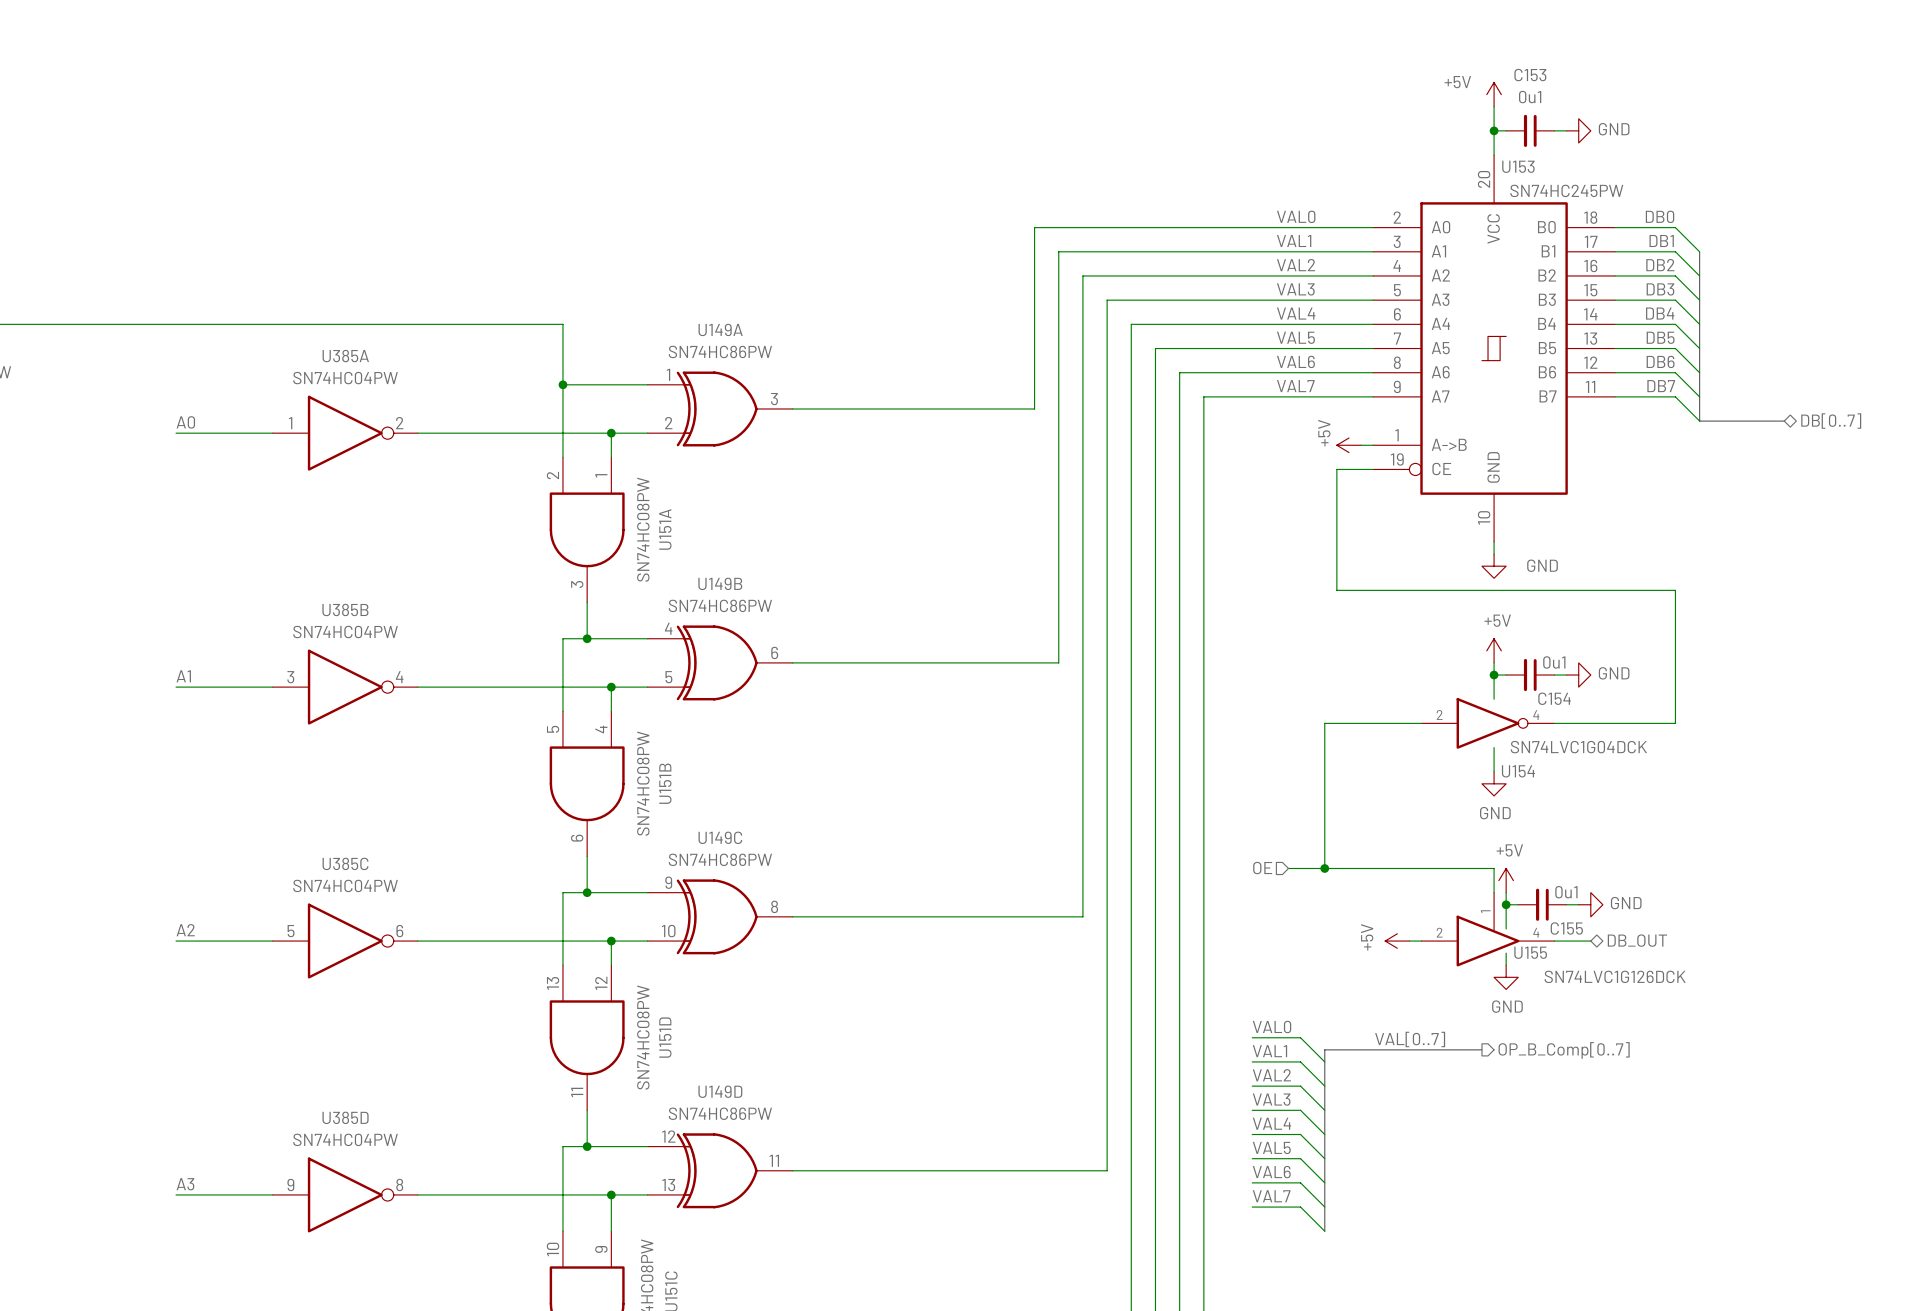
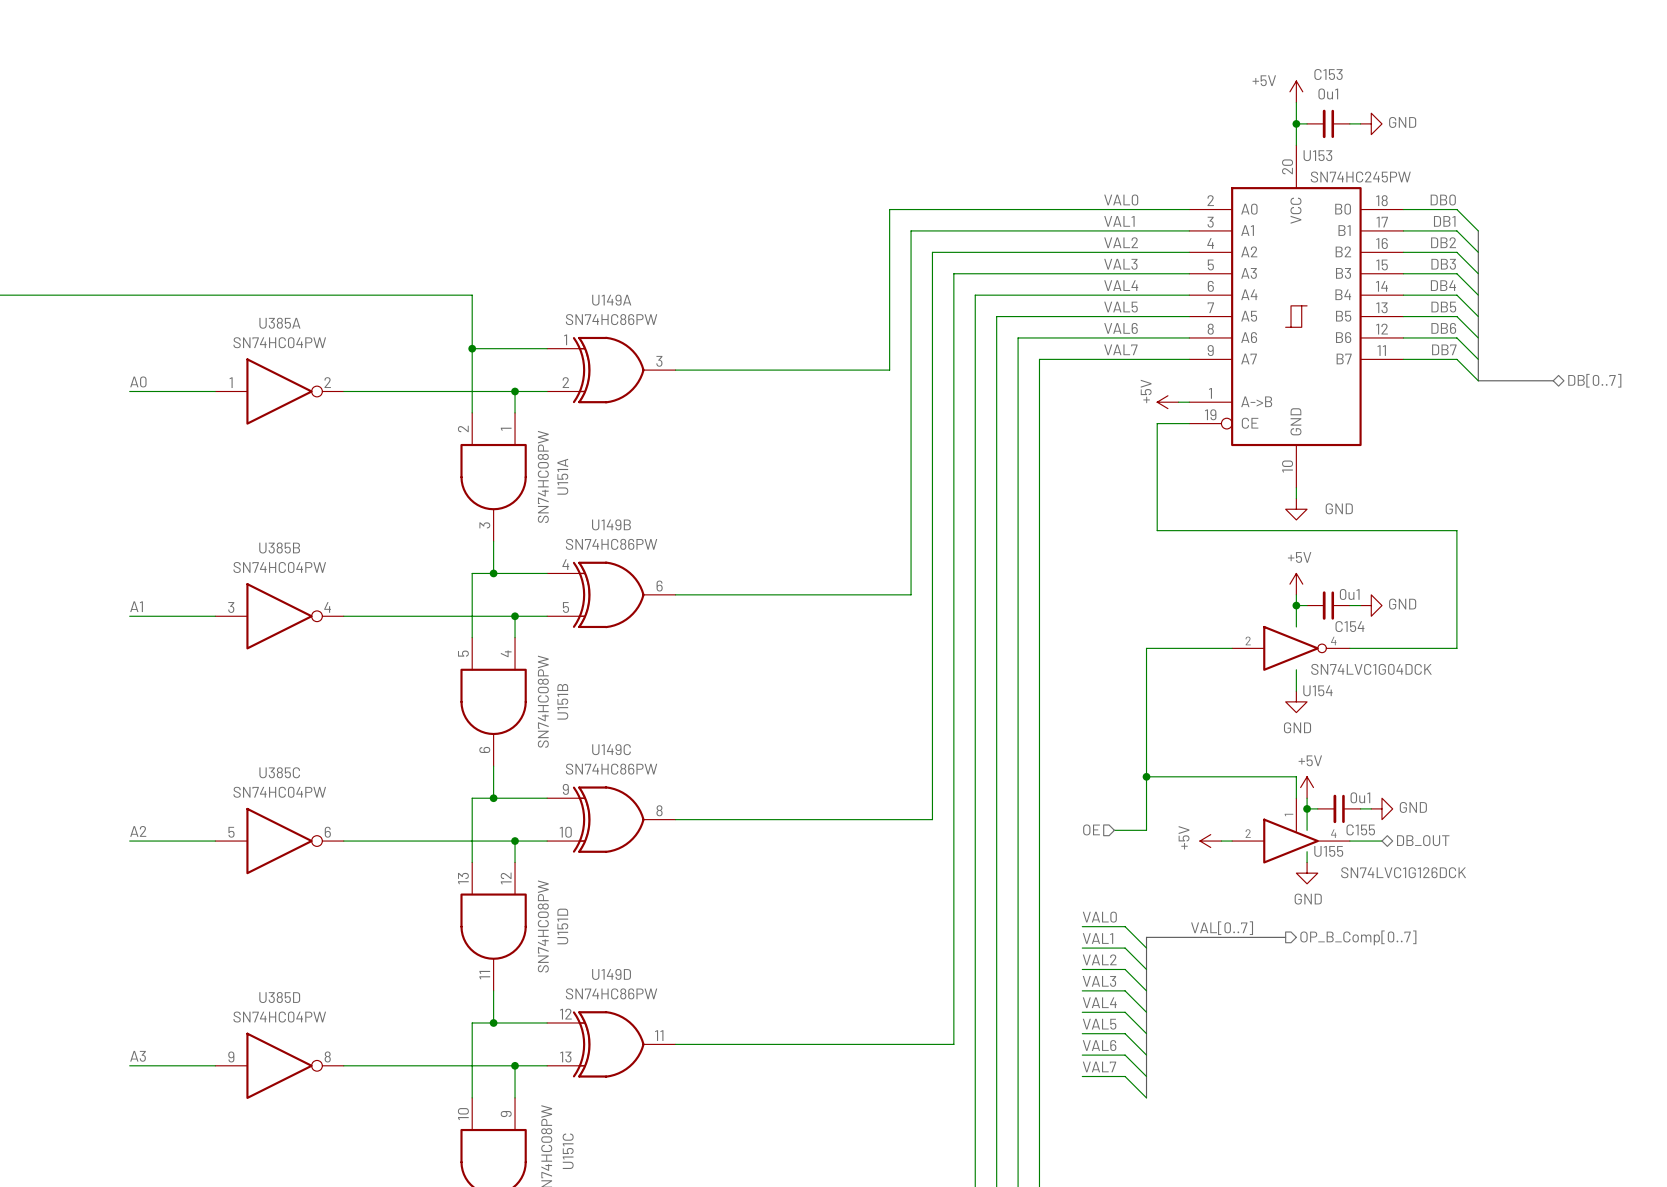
hierarchical label position: OE (1262, 868) -> OE (1091, 829)
wire: (1288, 868) (1324, 868) -> (1114, 830) (1146, 830) (1146, 776)

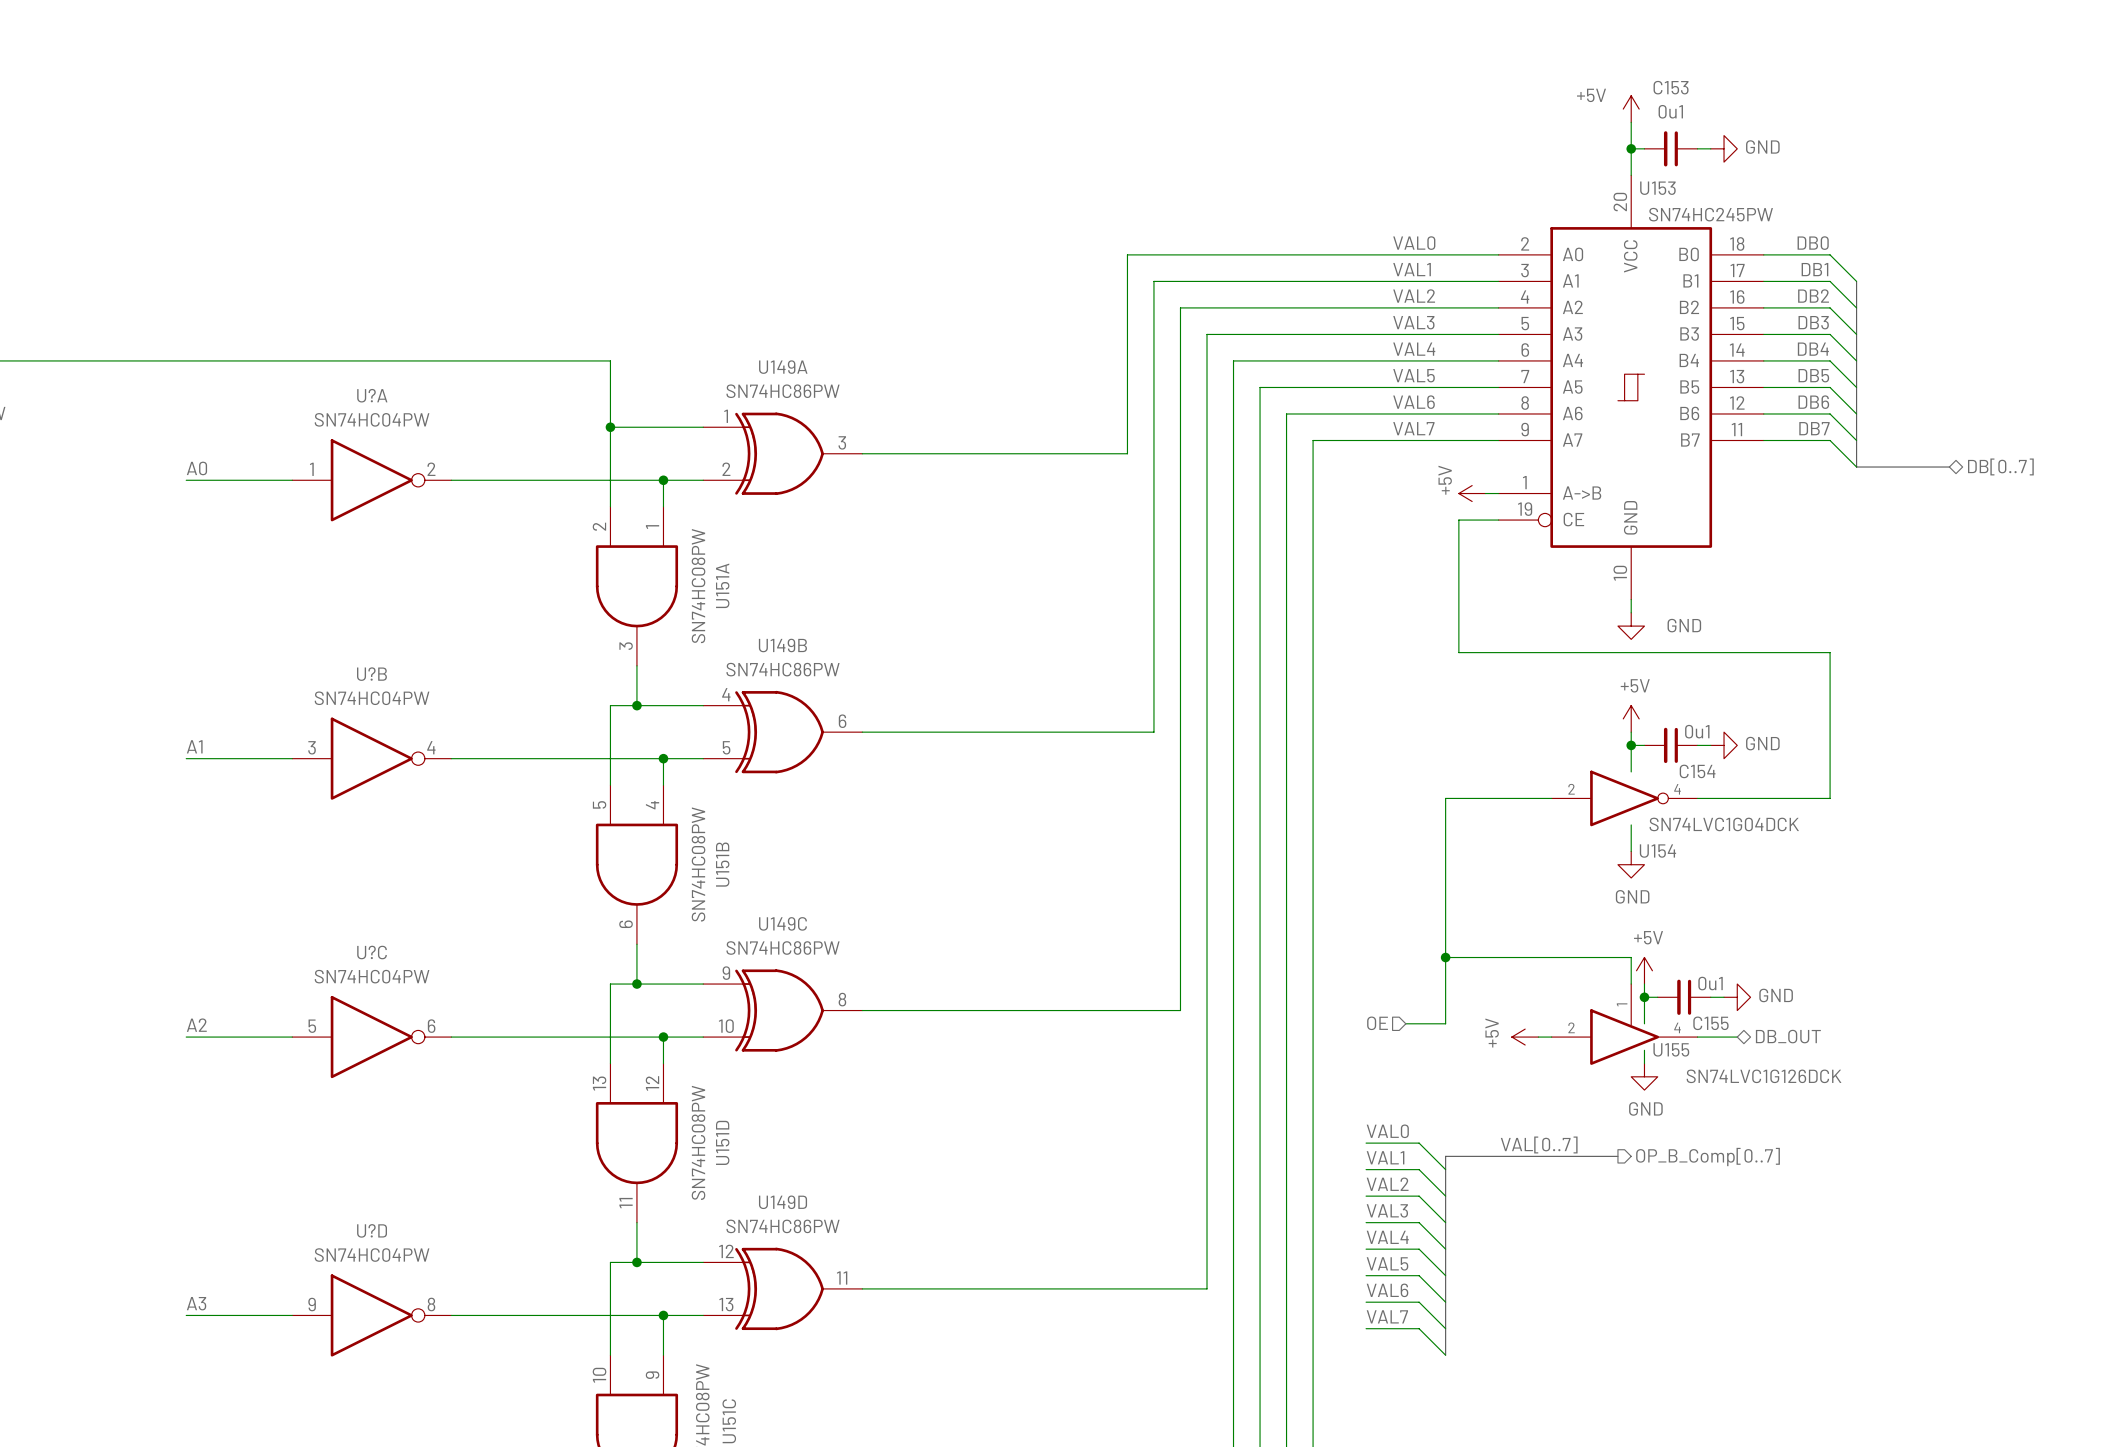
U385A name: U385A (279, 323) -> U?A (372, 395)
U385B name: U385B (279, 547) -> U?B (371, 674)
U385C name: U385C (279, 772) -> U?C (372, 952)
U385D name: U385D (279, 997) -> U?D (372, 1230)

